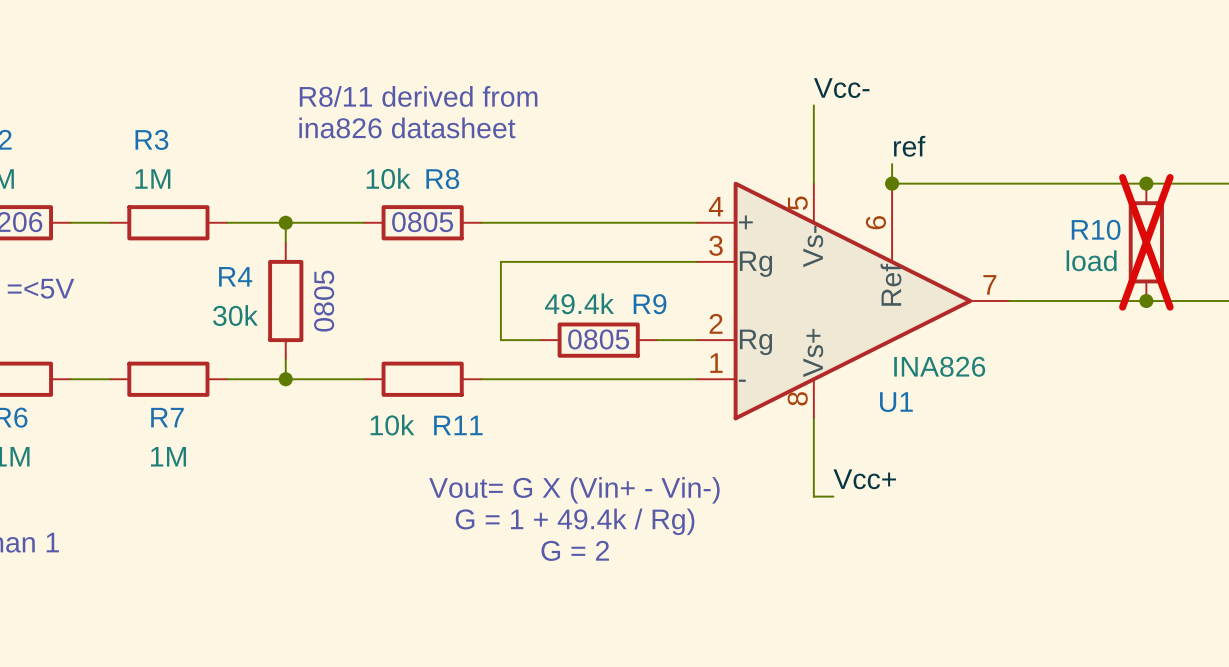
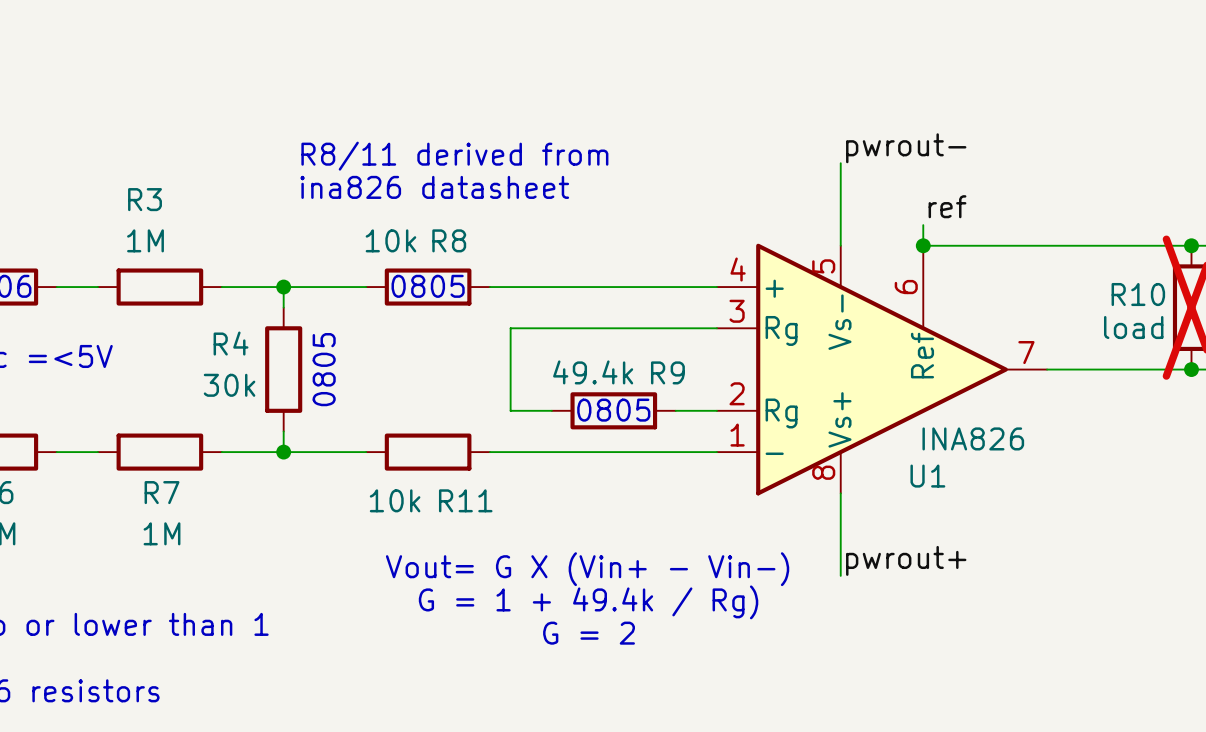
label: Vcc- (841, 88) -> pwrout- (906, 148)
label: Vcc+ (864, 479) -> none
label: none -> pwrout+ (906, 560)
wire: (813, 496) (833, 496) -> none

